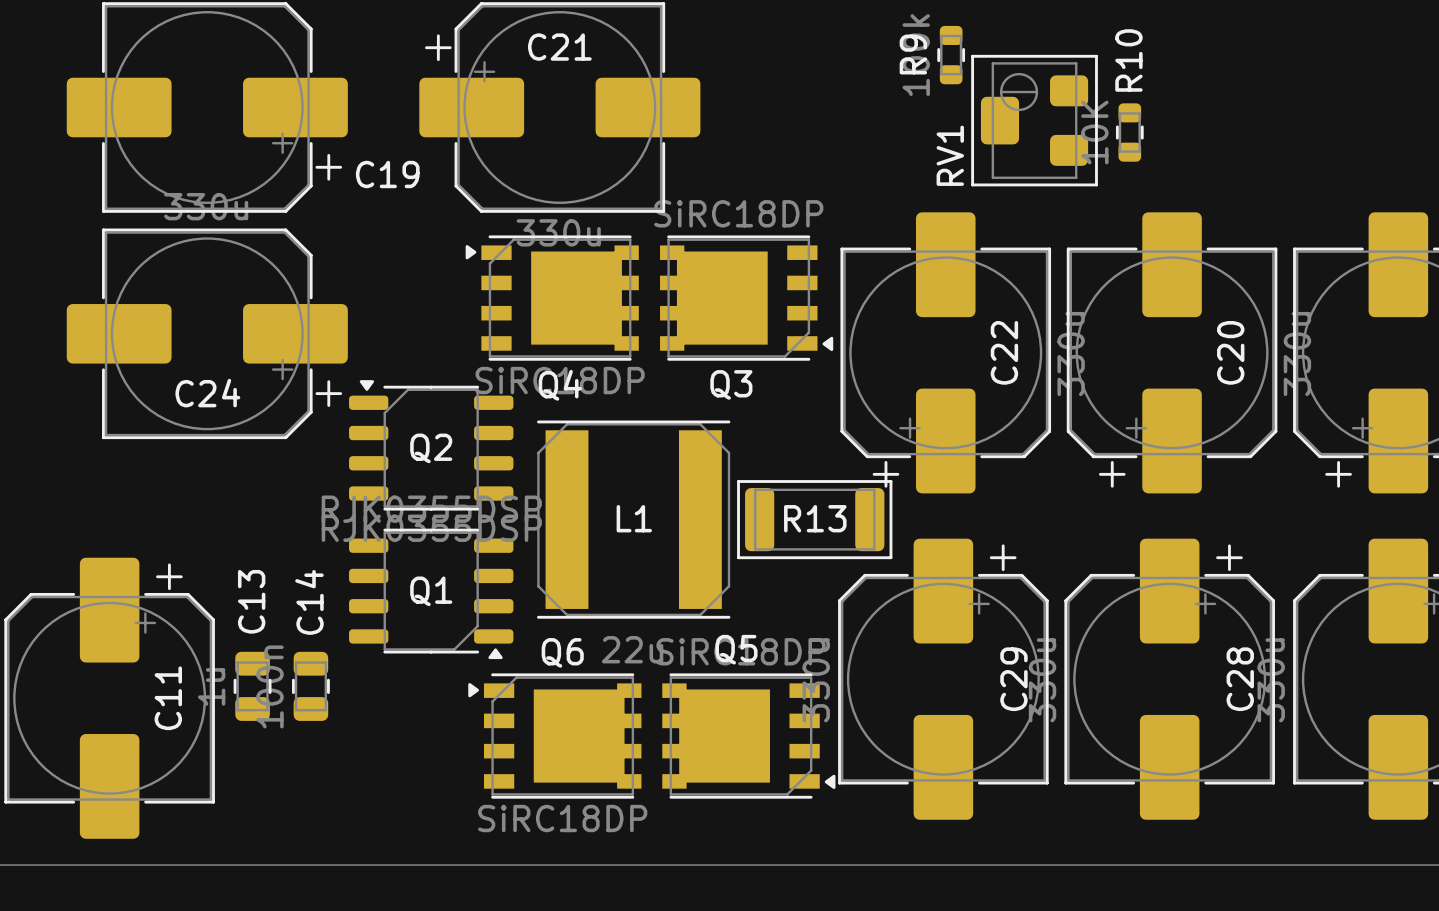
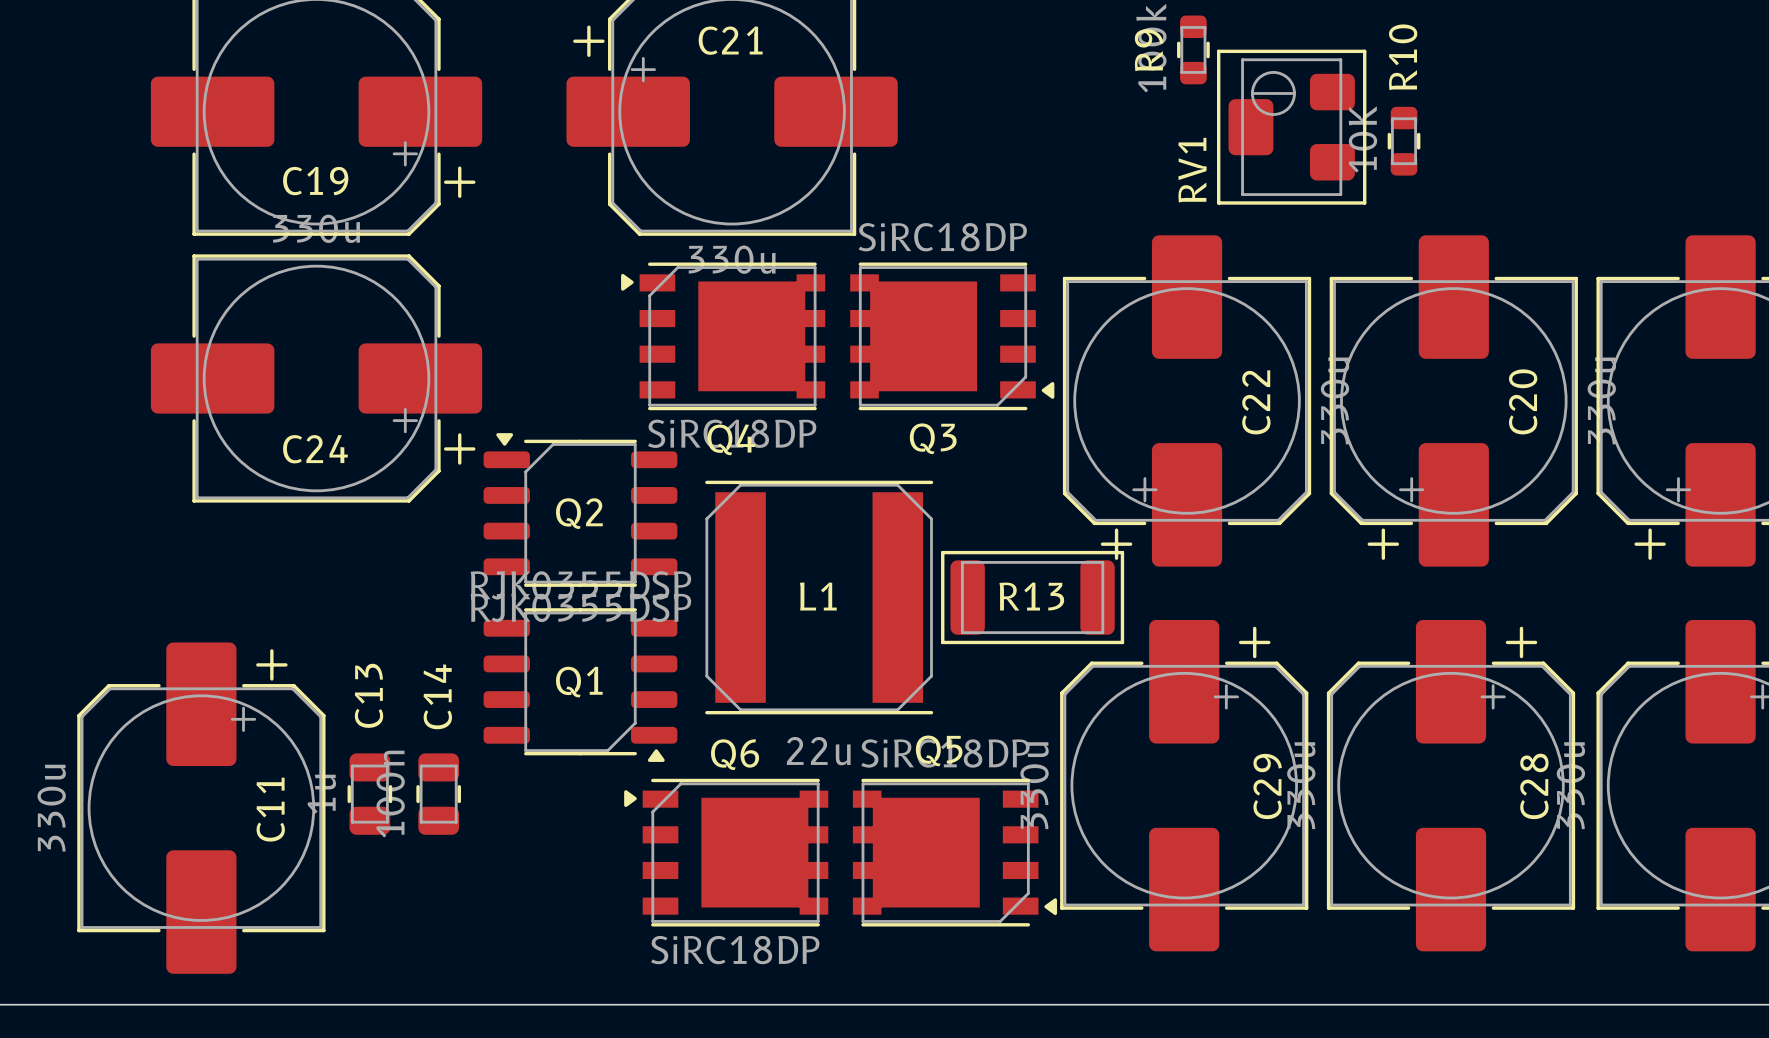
C19 name position: C19 (387, 174) -> C19 (315, 181)

